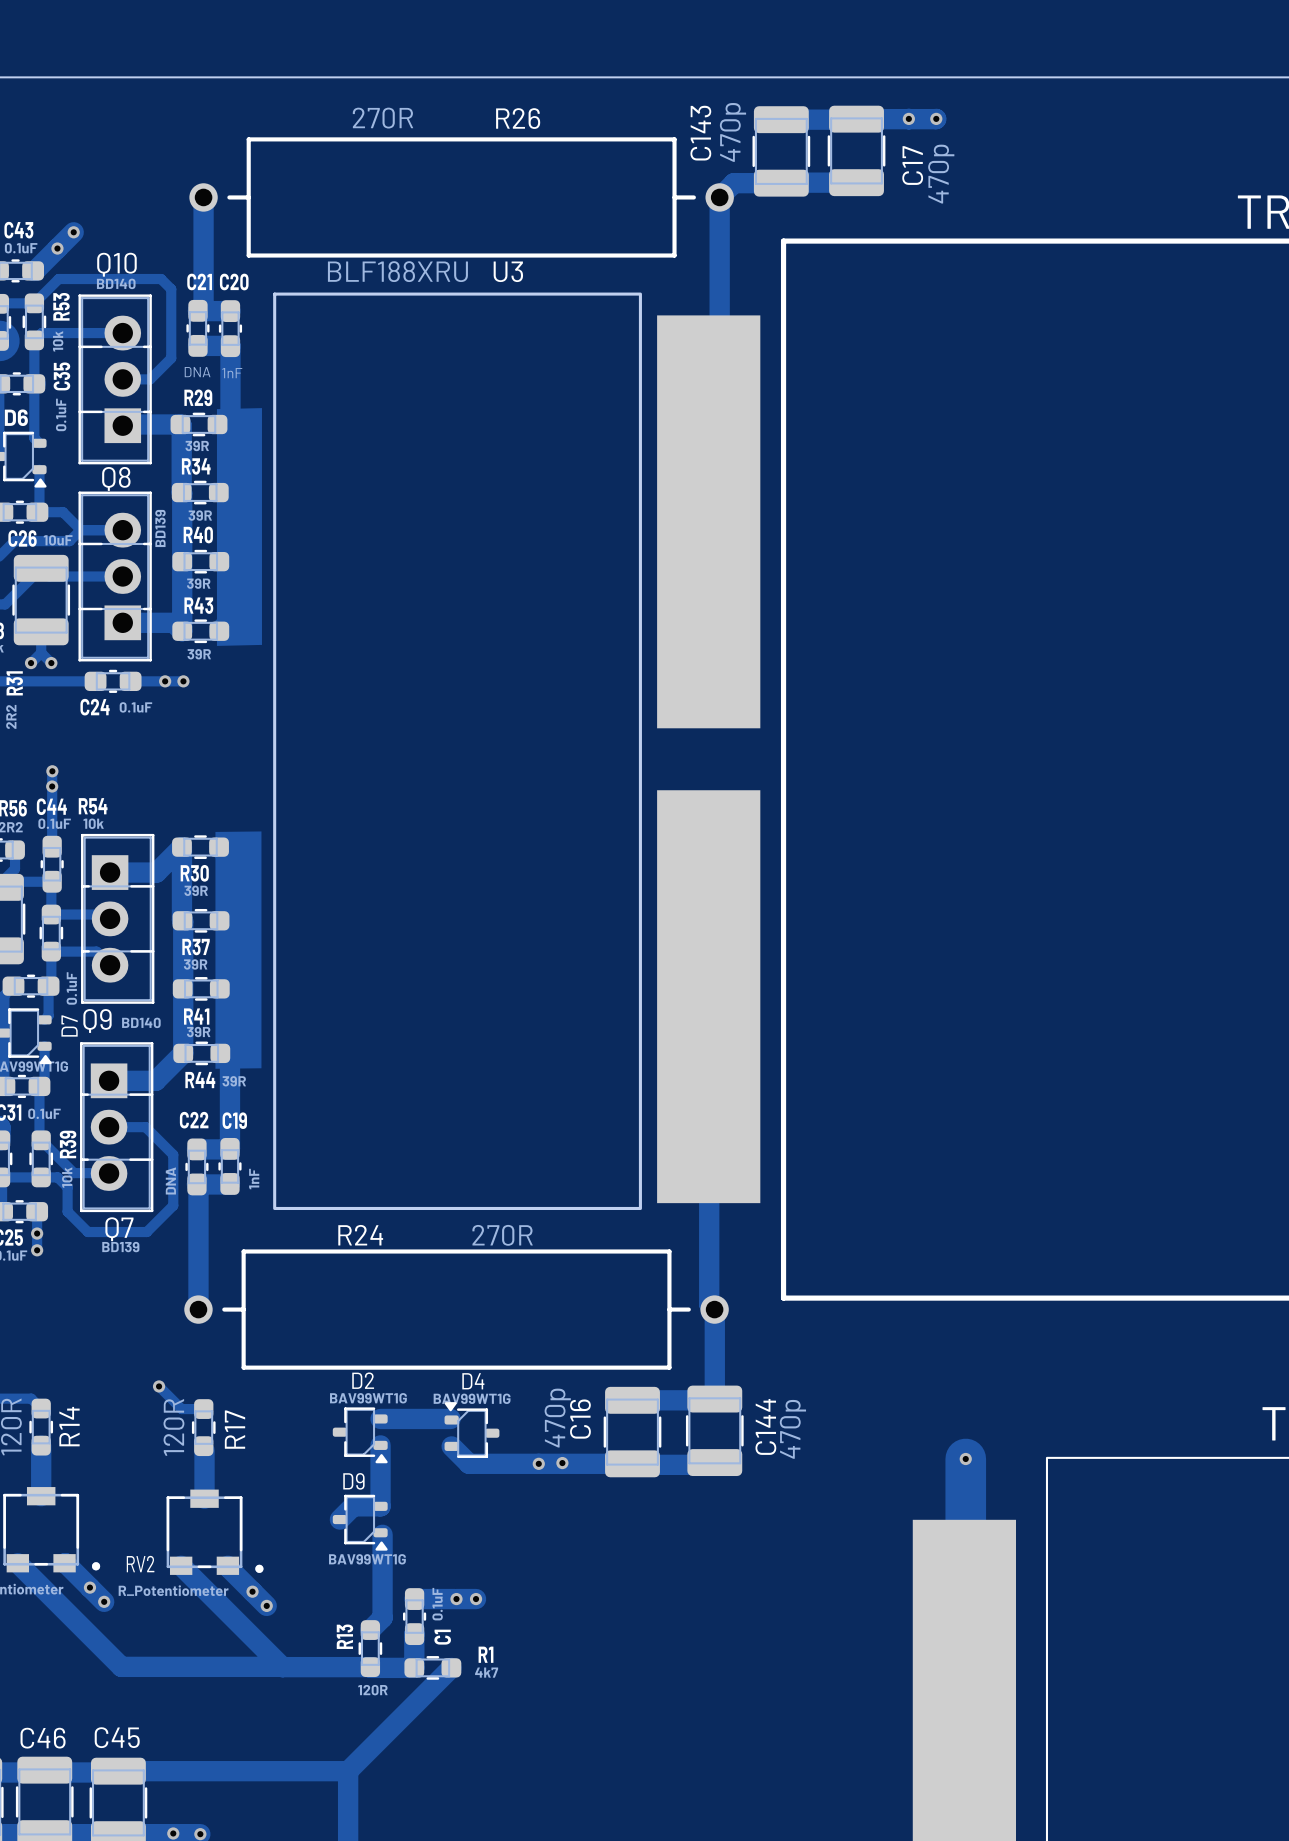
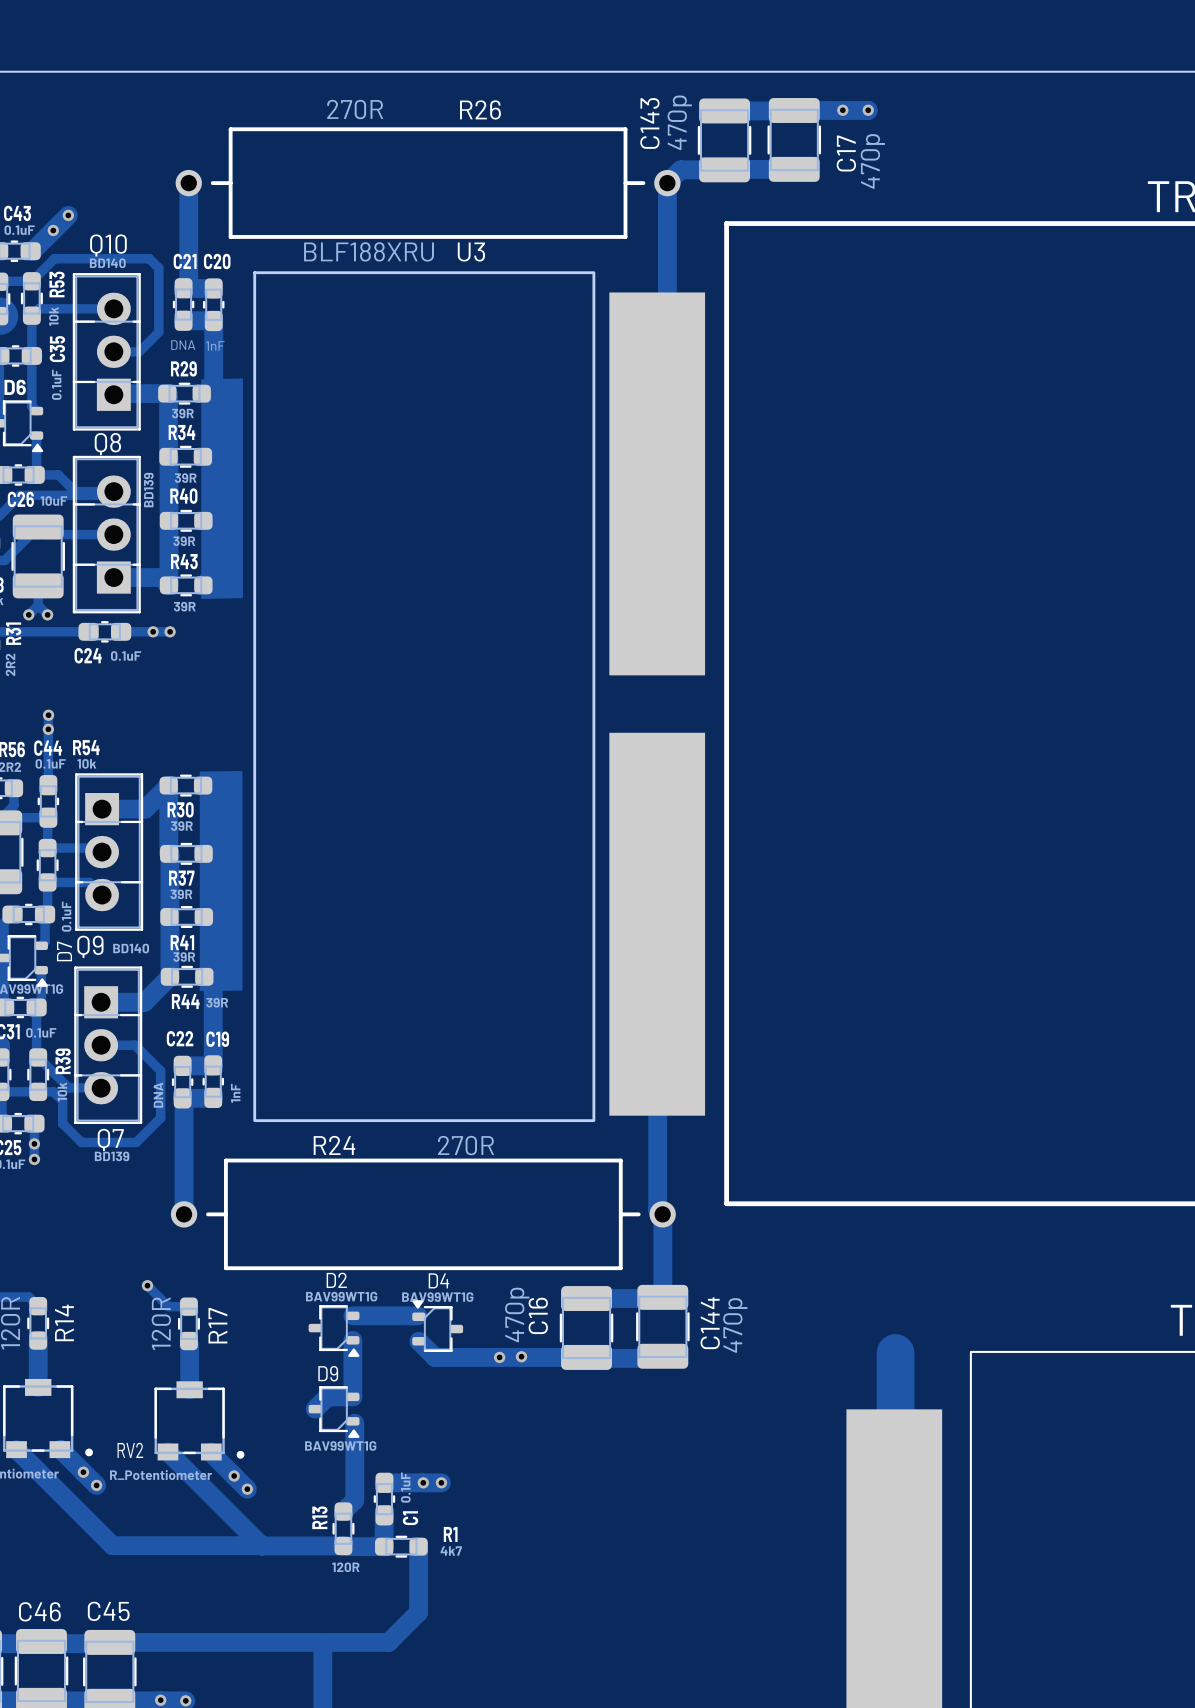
track: (80, 530) (69, 541) (14, 541) -> (113, 491) (110, 495) (19, 495) (13, 501)
via: (965, 1459) -> none
track: (451, 1667) (348, 1771) -> (418, 1546) (418, 1612) (388, 1642) (322, 1642)

